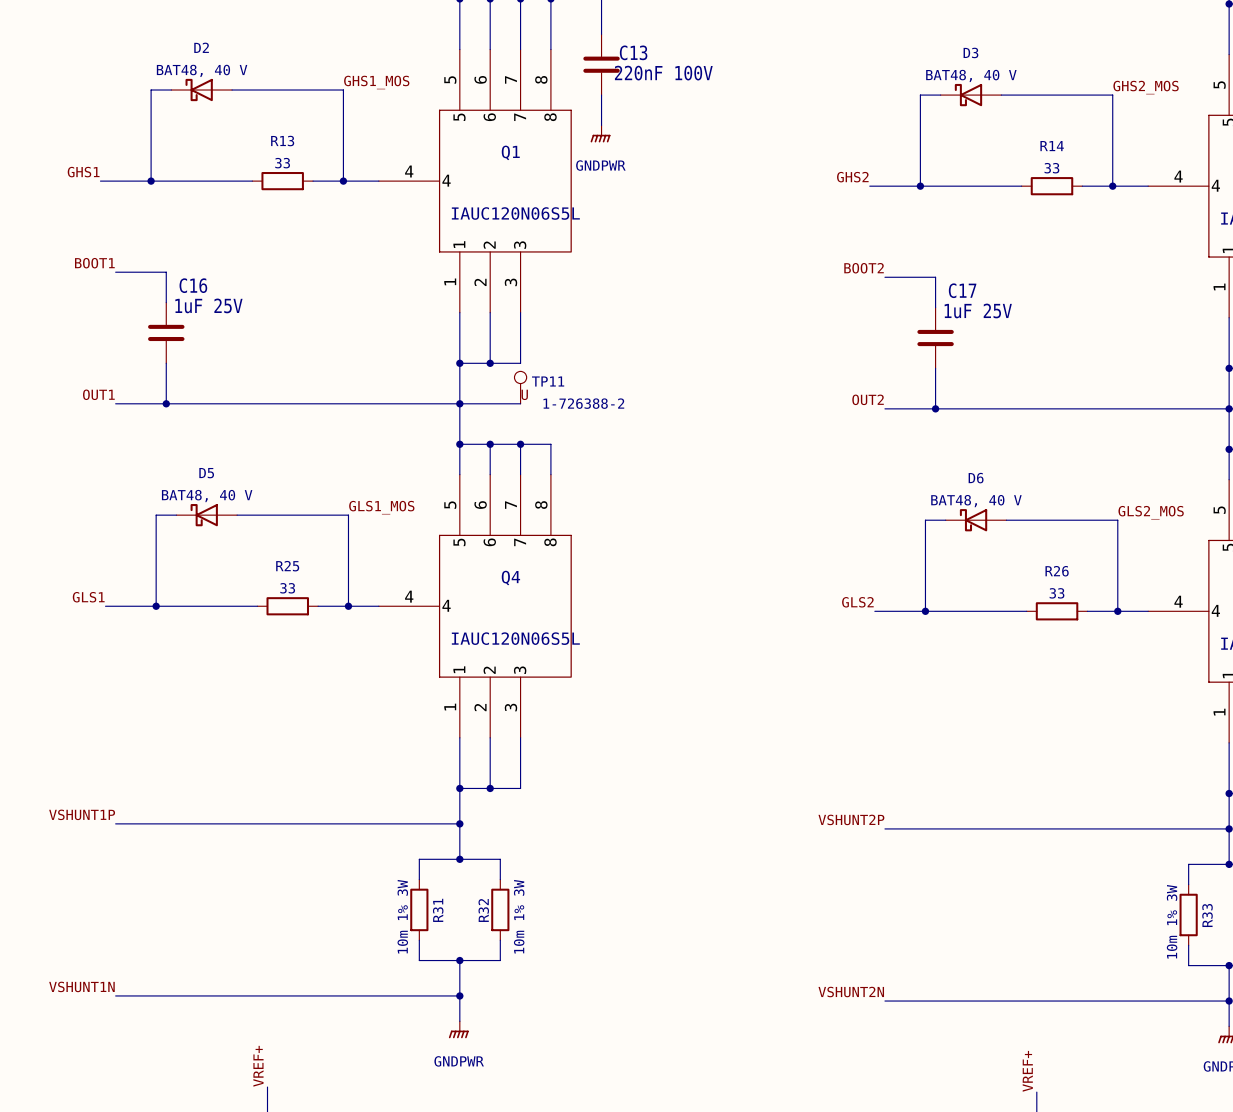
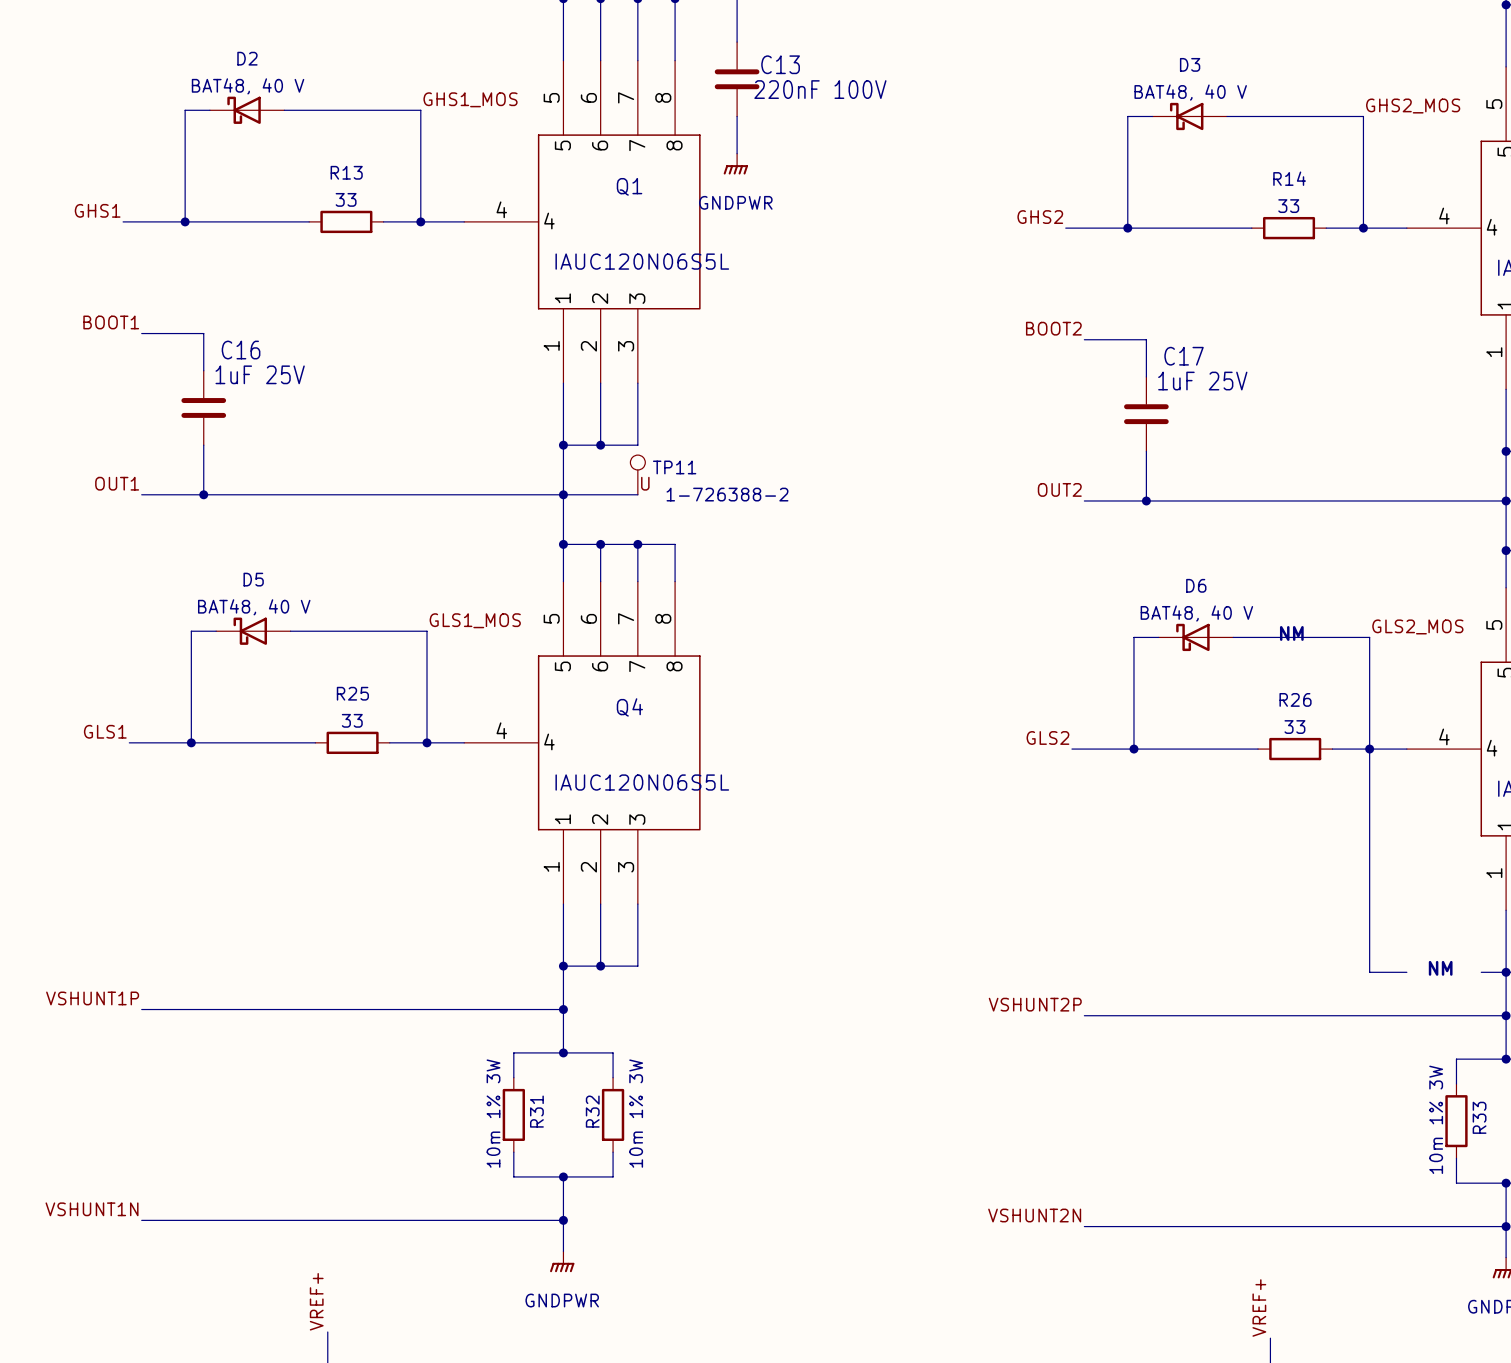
text: none -> NM (1291, 633)
wire: none -> (1369, 749) (1369, 972) (1406, 972)
text: none -> NM (1440, 968)
wire: none -> (1481, 972) (1506, 972)

